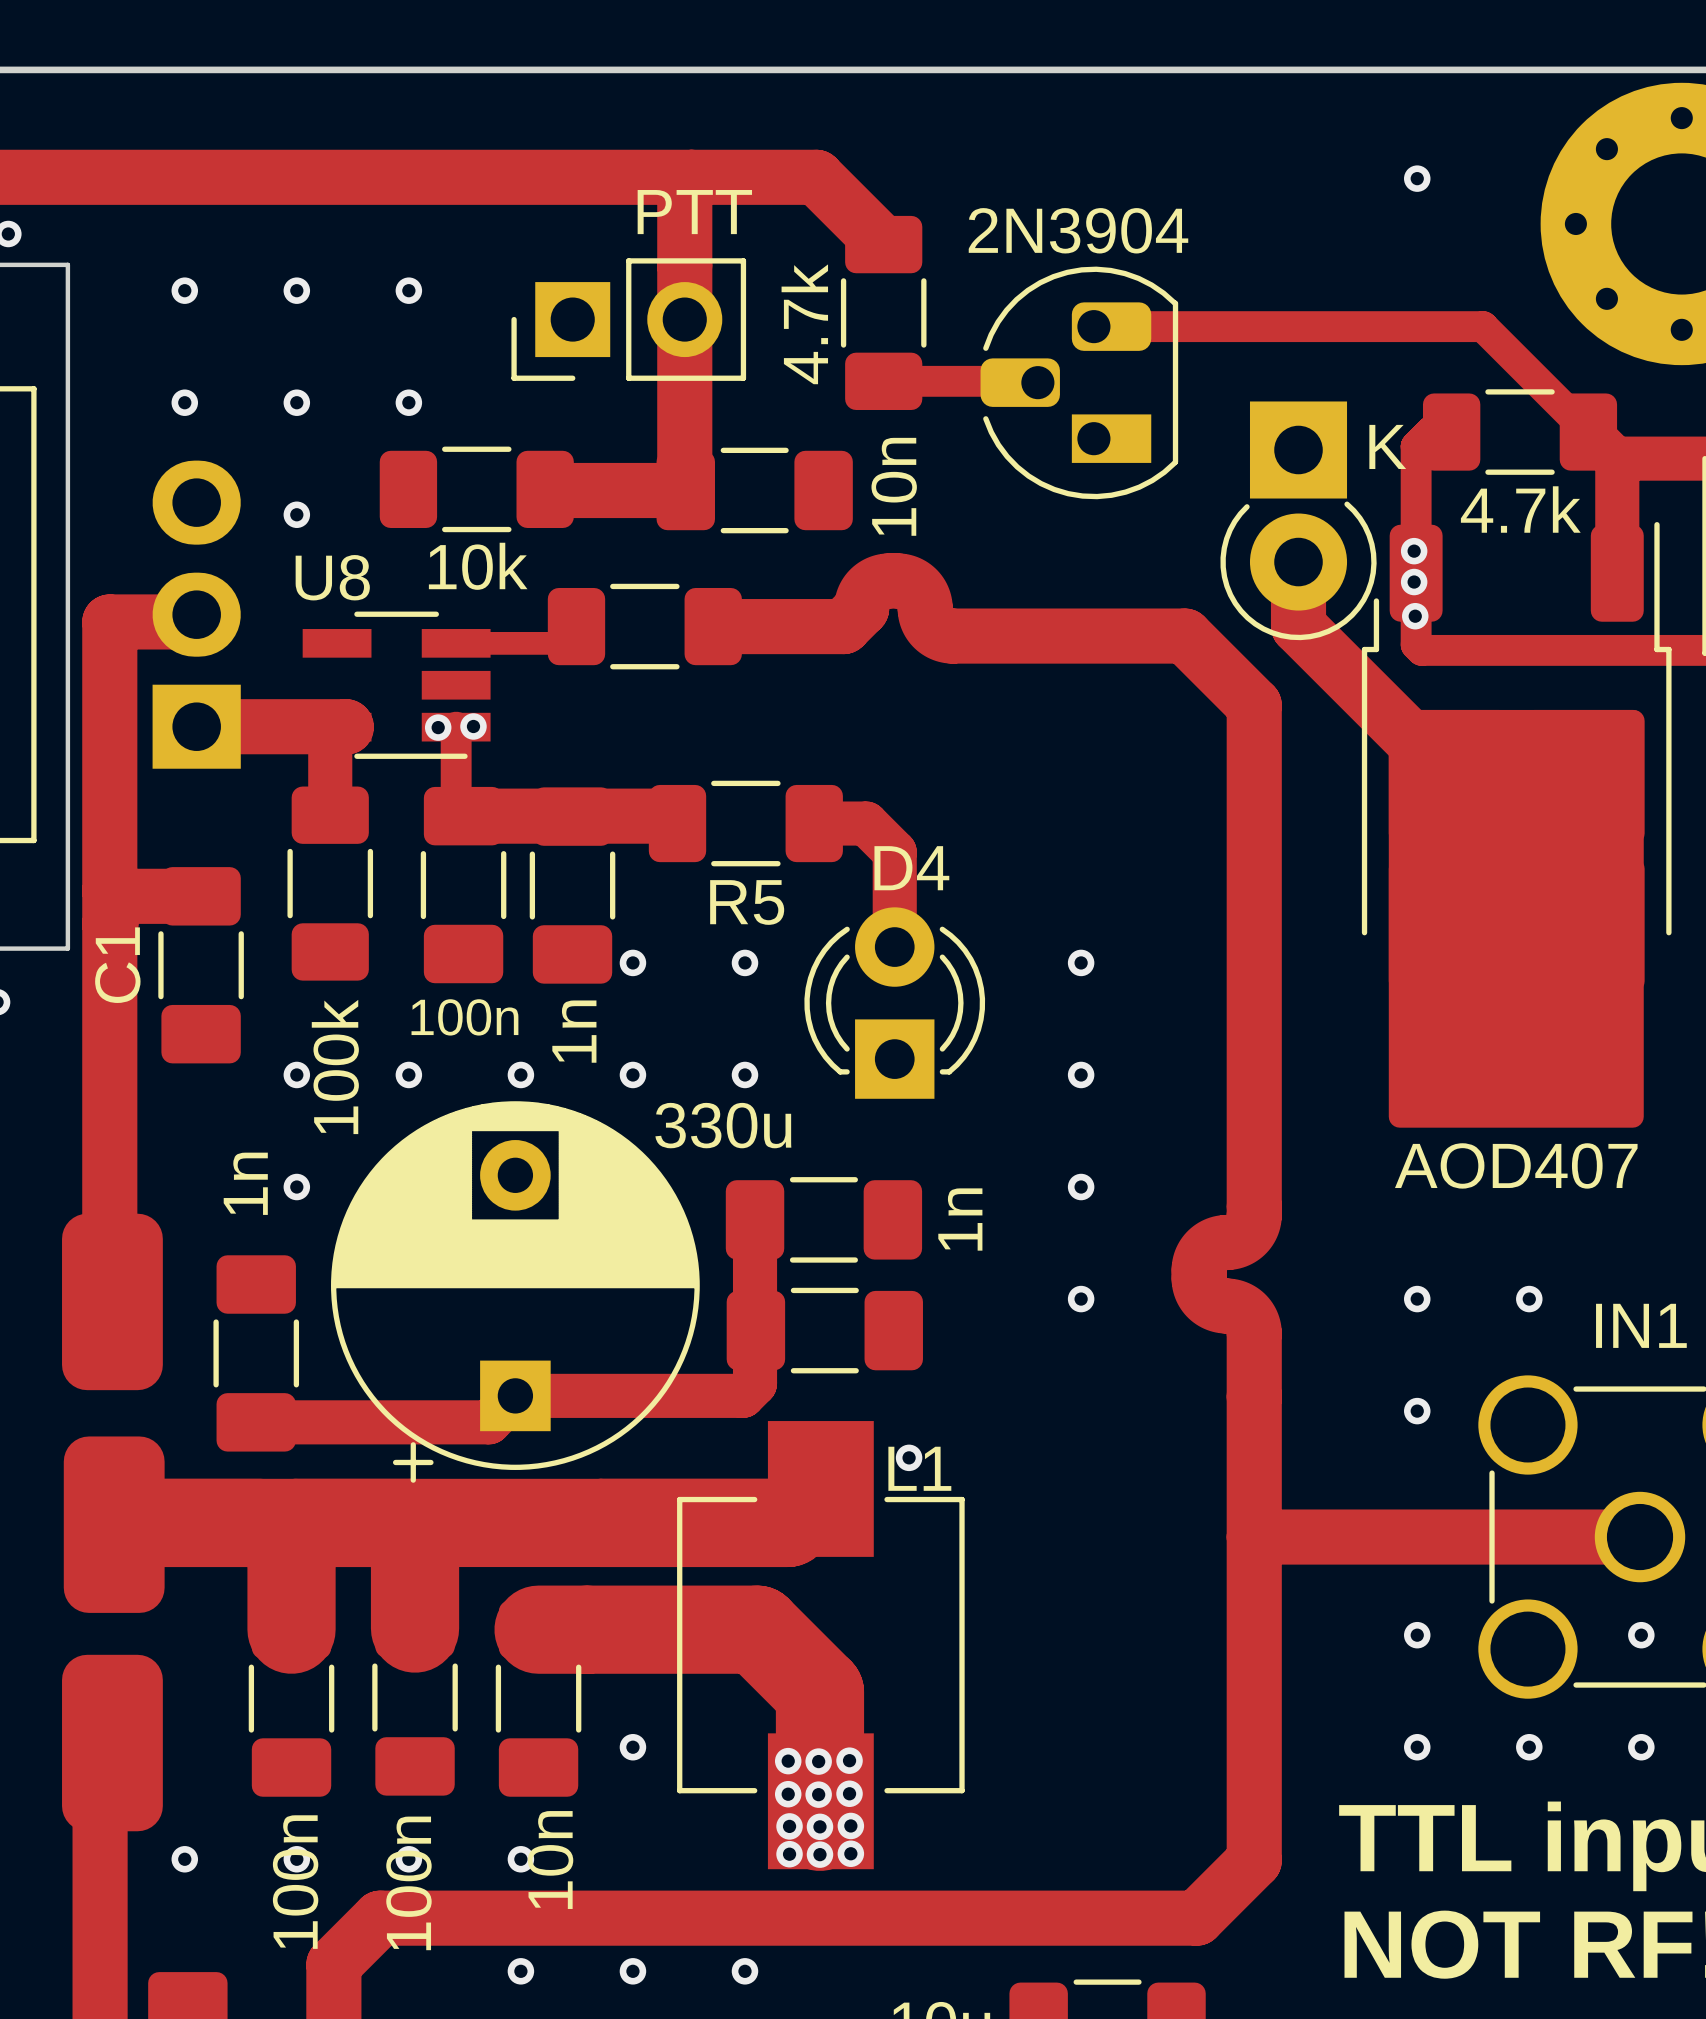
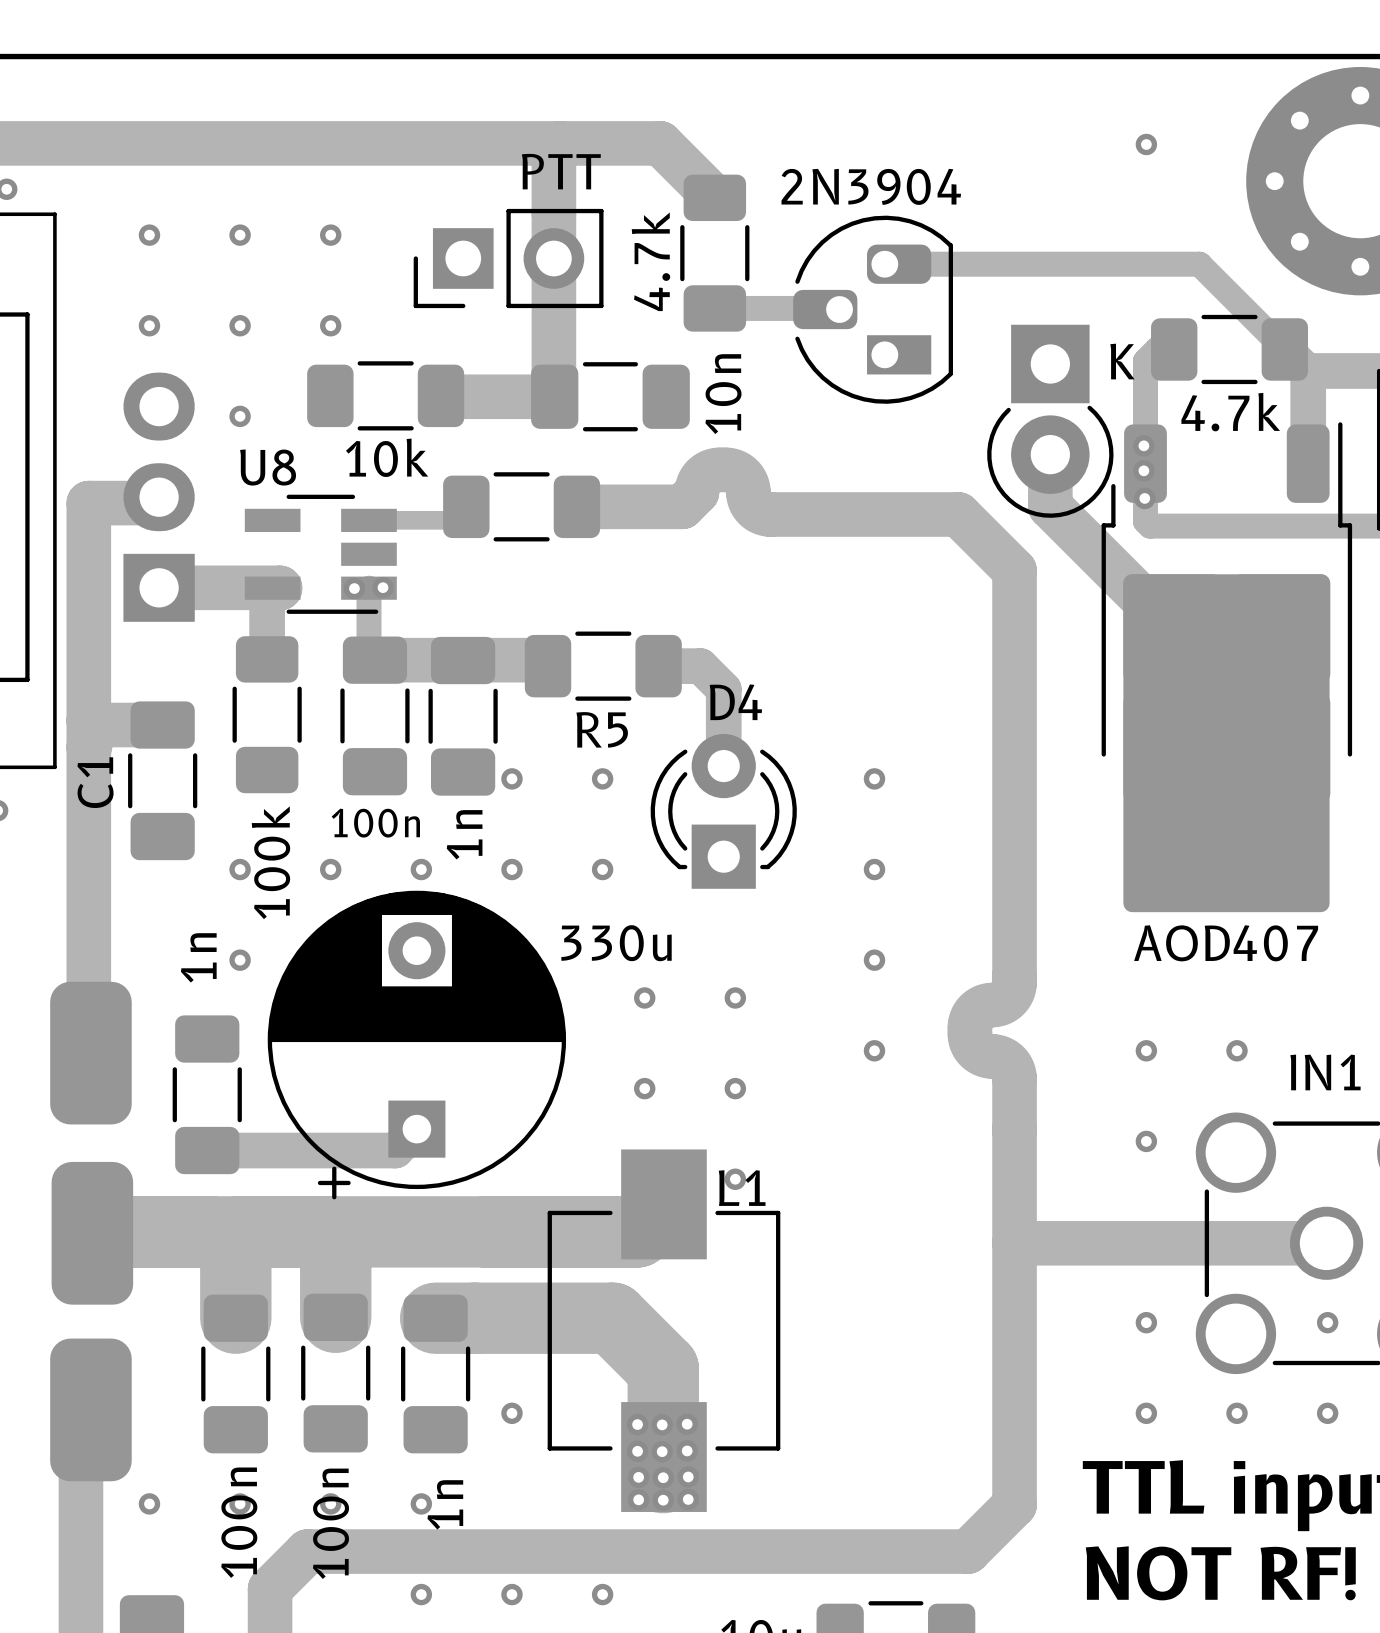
part value position: 330u (723, 1125) -> 330u (616, 943)
track: (755, 1219) (755, 1383) (742, 1395) (515, 1395) -> none
part: 1n (823, 1219) -> none
via: none -> (644, 997)
via: none -> (735, 997)
part: (824, 1330) -> none
via: none -> (644, 1088)
via: none -> (735, 1088)
part value: 10n (550, 1860) -> 1n (445, 1504)

